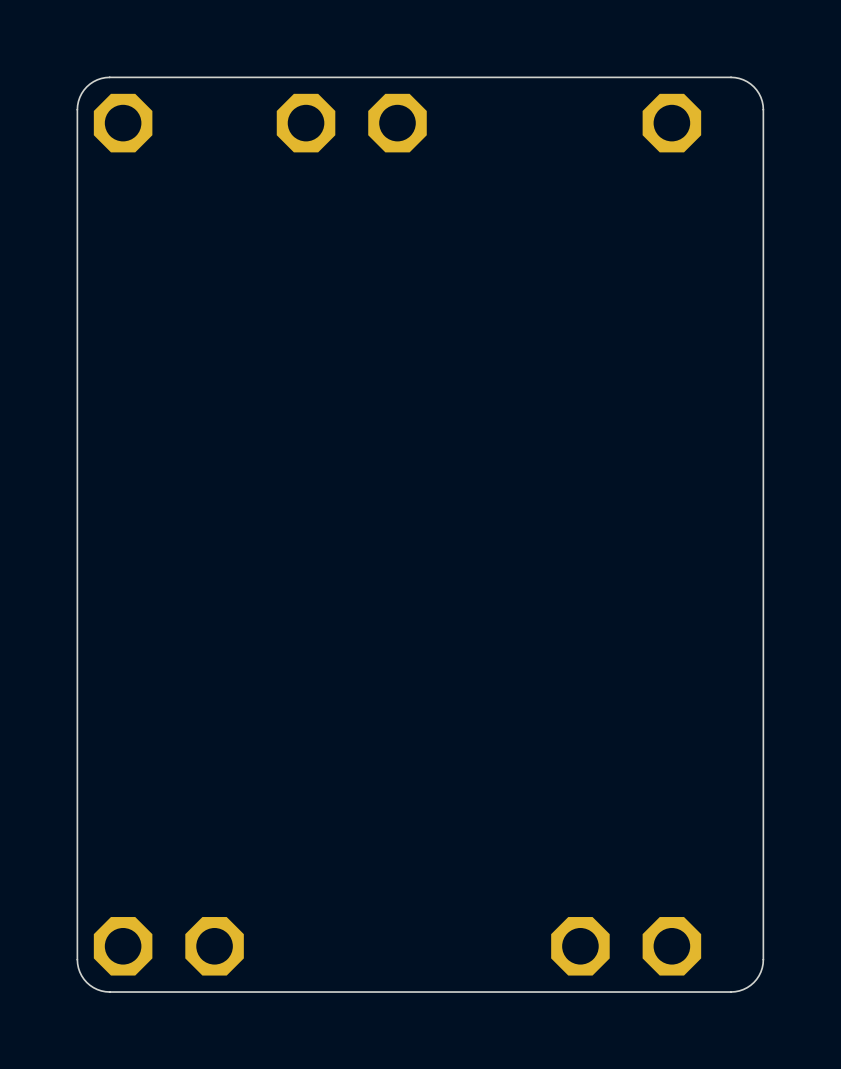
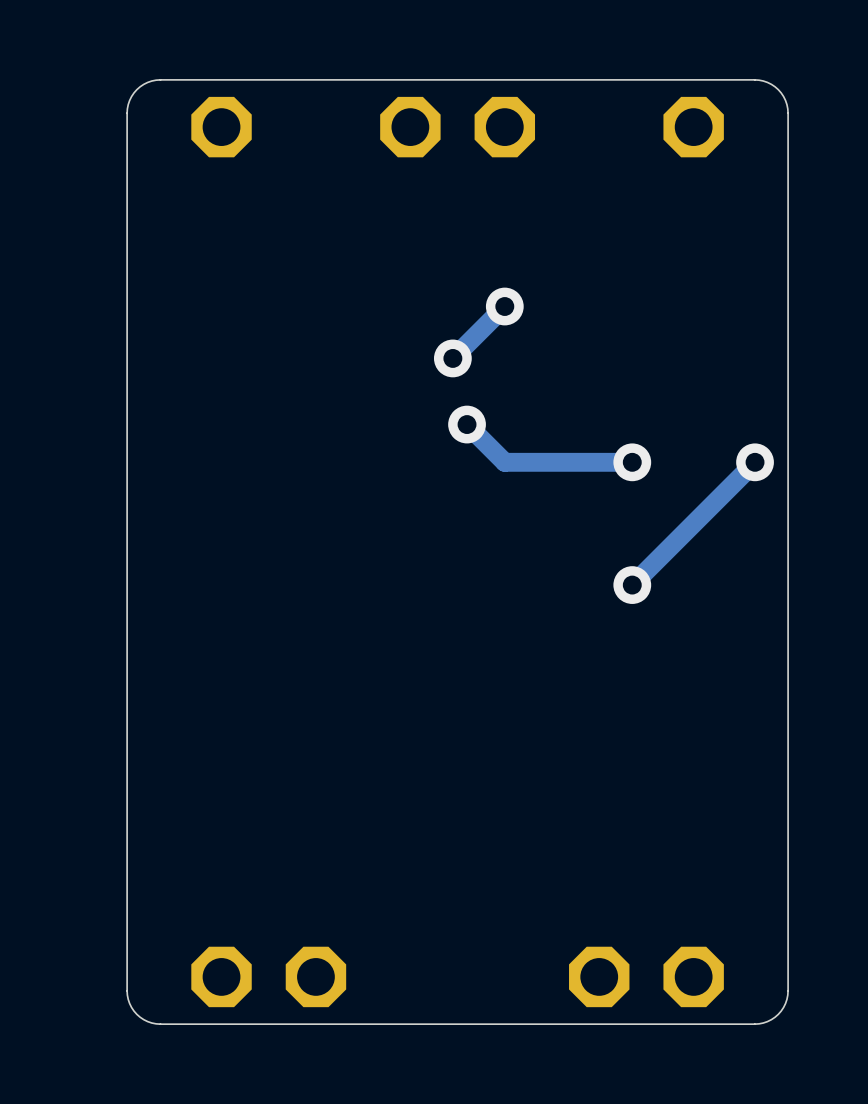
board edge: (155, 77) (109, 77) (97, 79) (86, 86) (81, 93) (77, 109) (77, 963) (84, 979) (97, 989) (109, 992) (155, 992) -> (160, 79) (147, 82) (136, 89) (129, 100) (127, 113) (127, 990) (129, 1003) (136, 1014) (147, 1021) (160, 1024)
part: (123, 123) -> none
part: none -> (221, 127)
part: (306, 123) -> none
part: none -> (504, 127)
track: none -> (504, 306) (452, 358)
via: none -> (504, 306)
via: none -> (452, 358)
track: none -> (467, 424) (504, 462) (632, 462)
via: none -> (467, 424)
via: none -> (632, 462)
track: none -> (755, 462) (632, 585)
via: none -> (755, 462)
via: none -> (632, 585)
part position: (123, 946) -> (315, 976)

